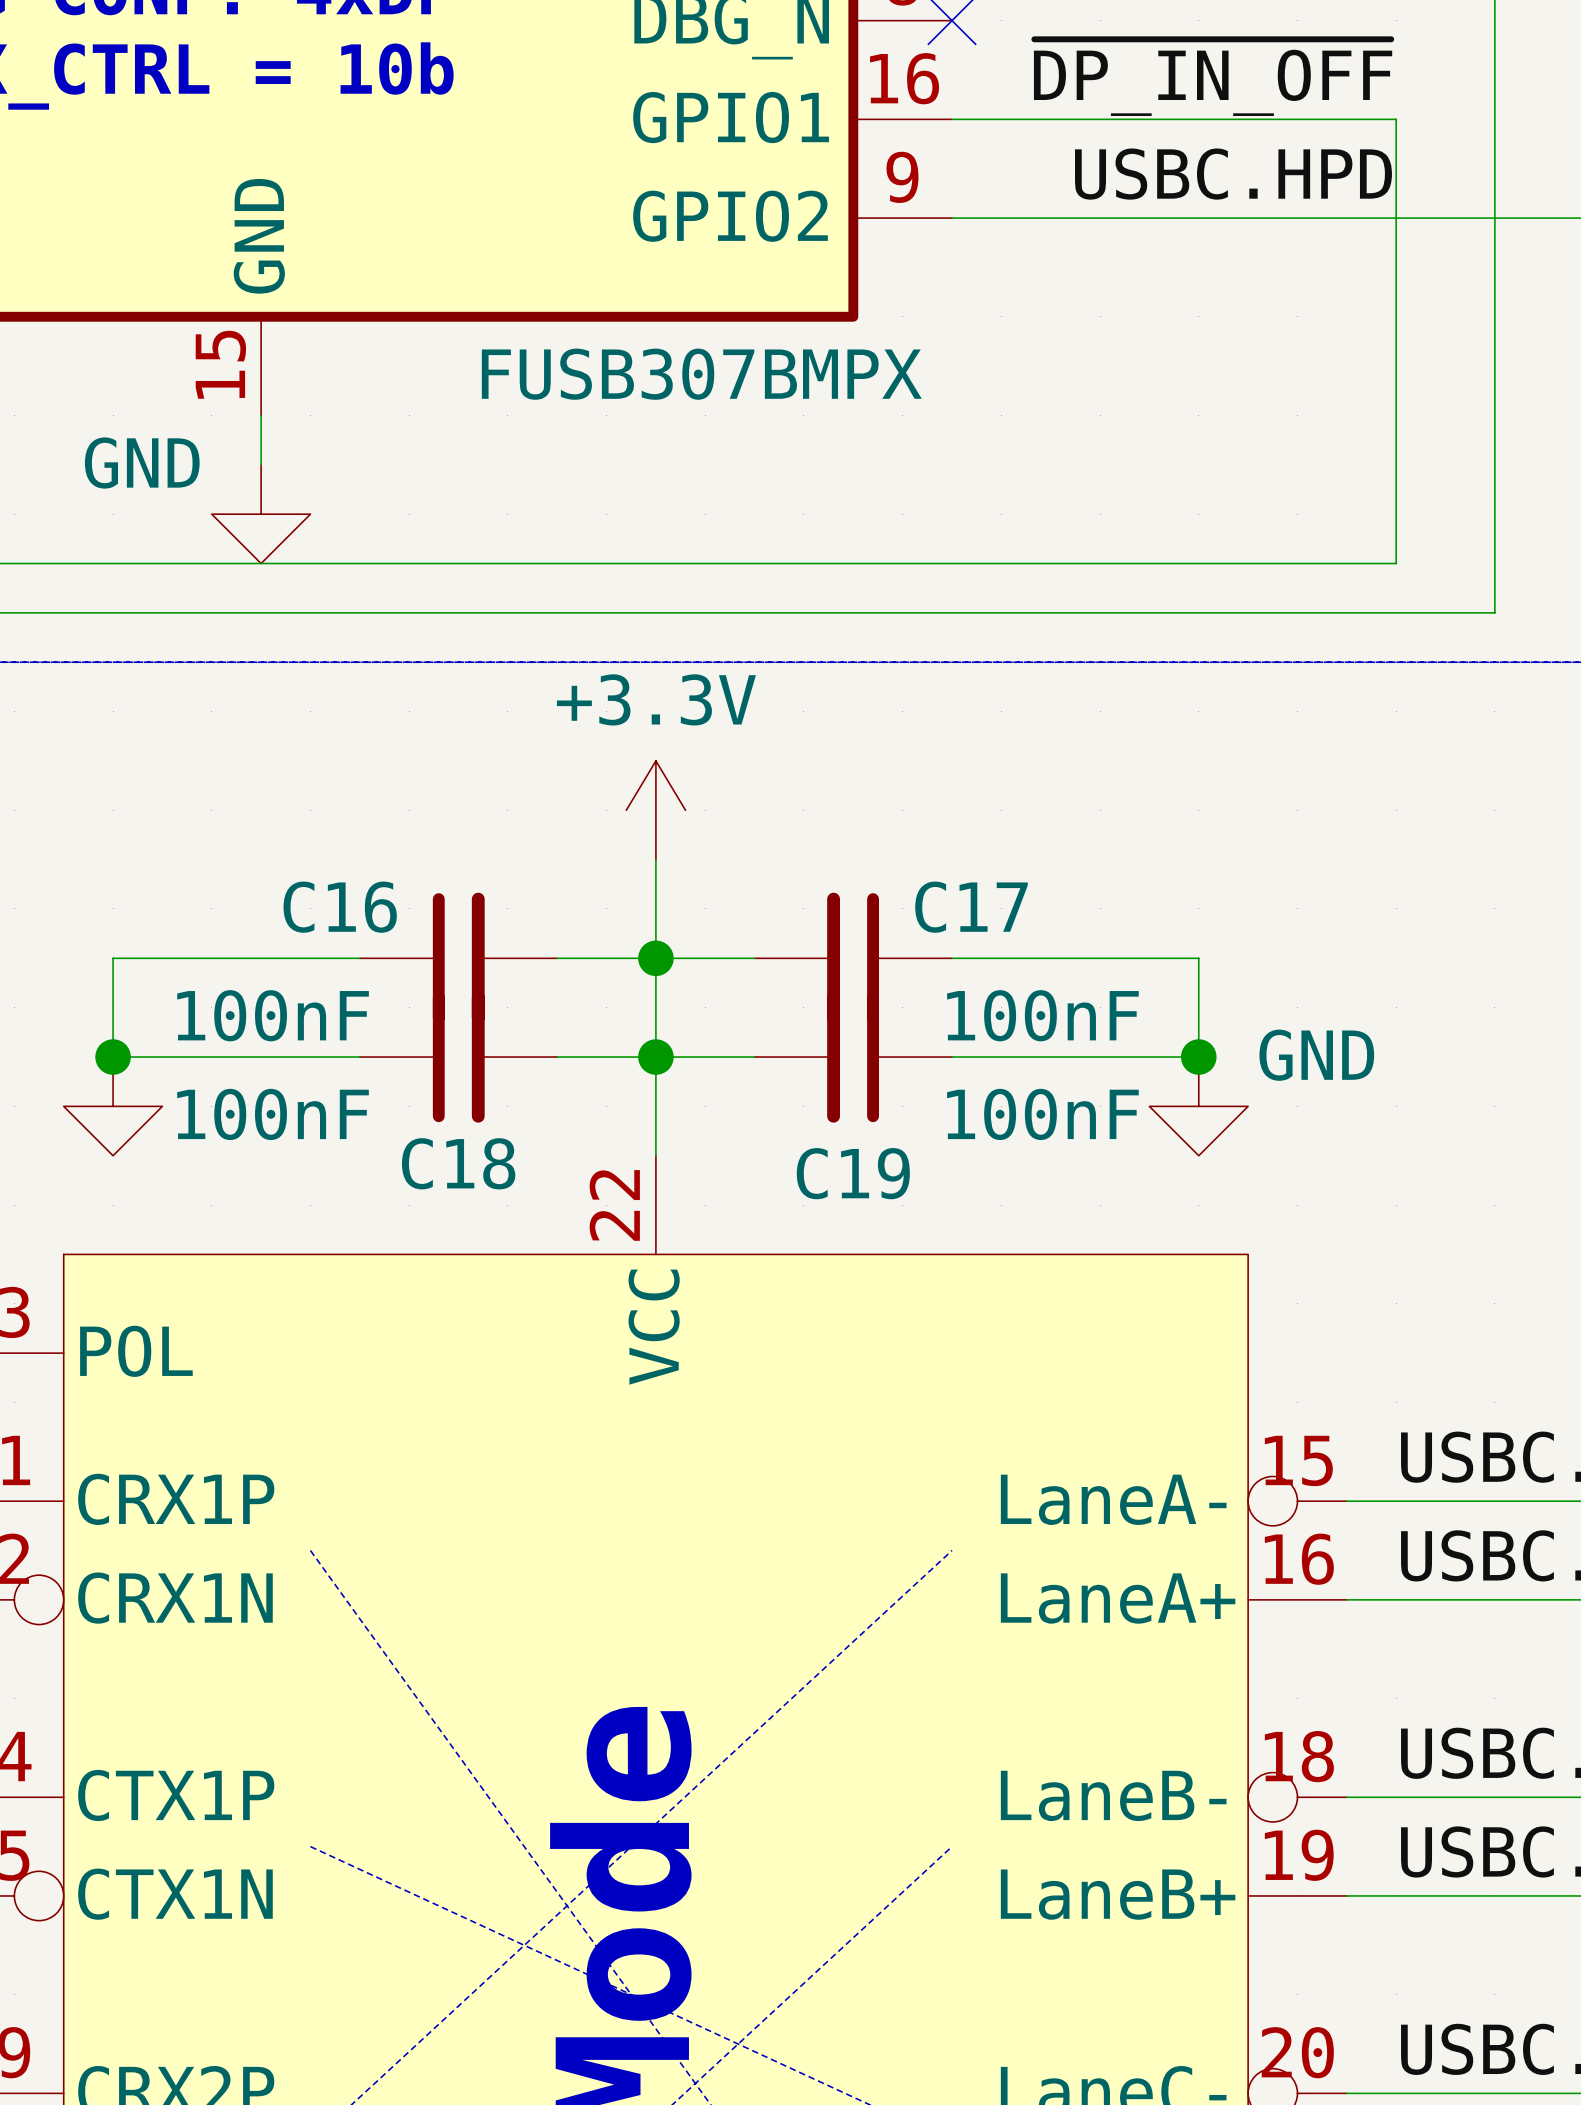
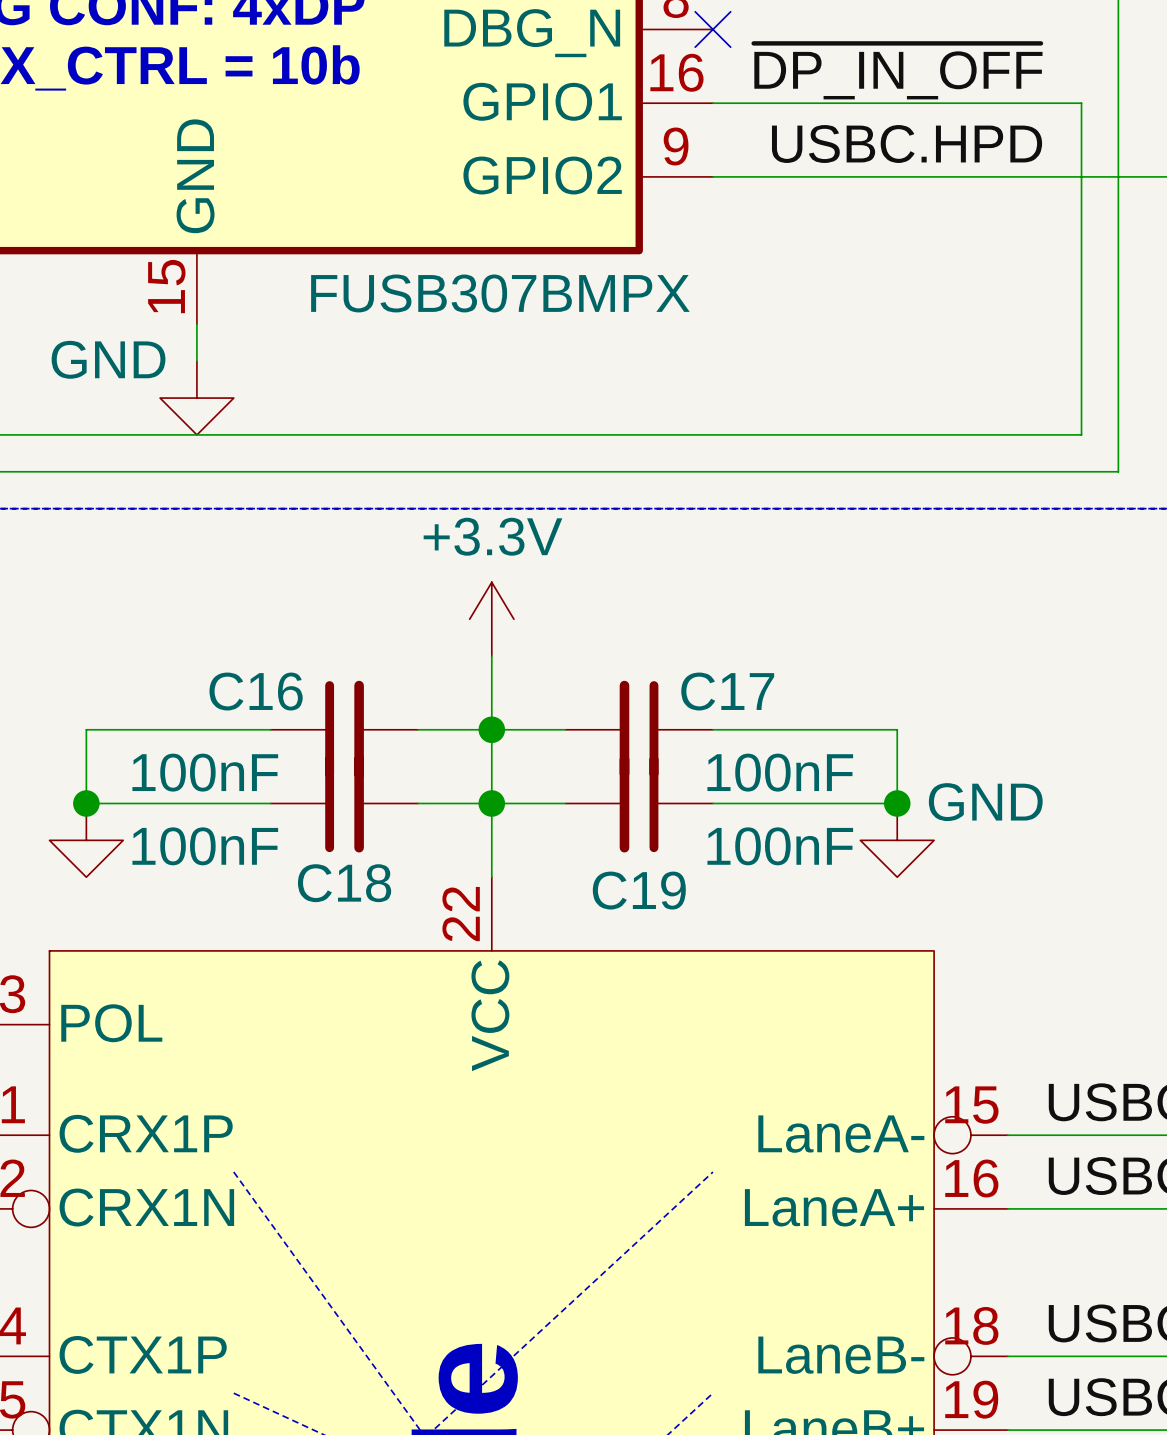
wire: (1396, 119) (1396, 563) -> (1044, 103) (1081, 103) (1081, 434) (1044, 434)

